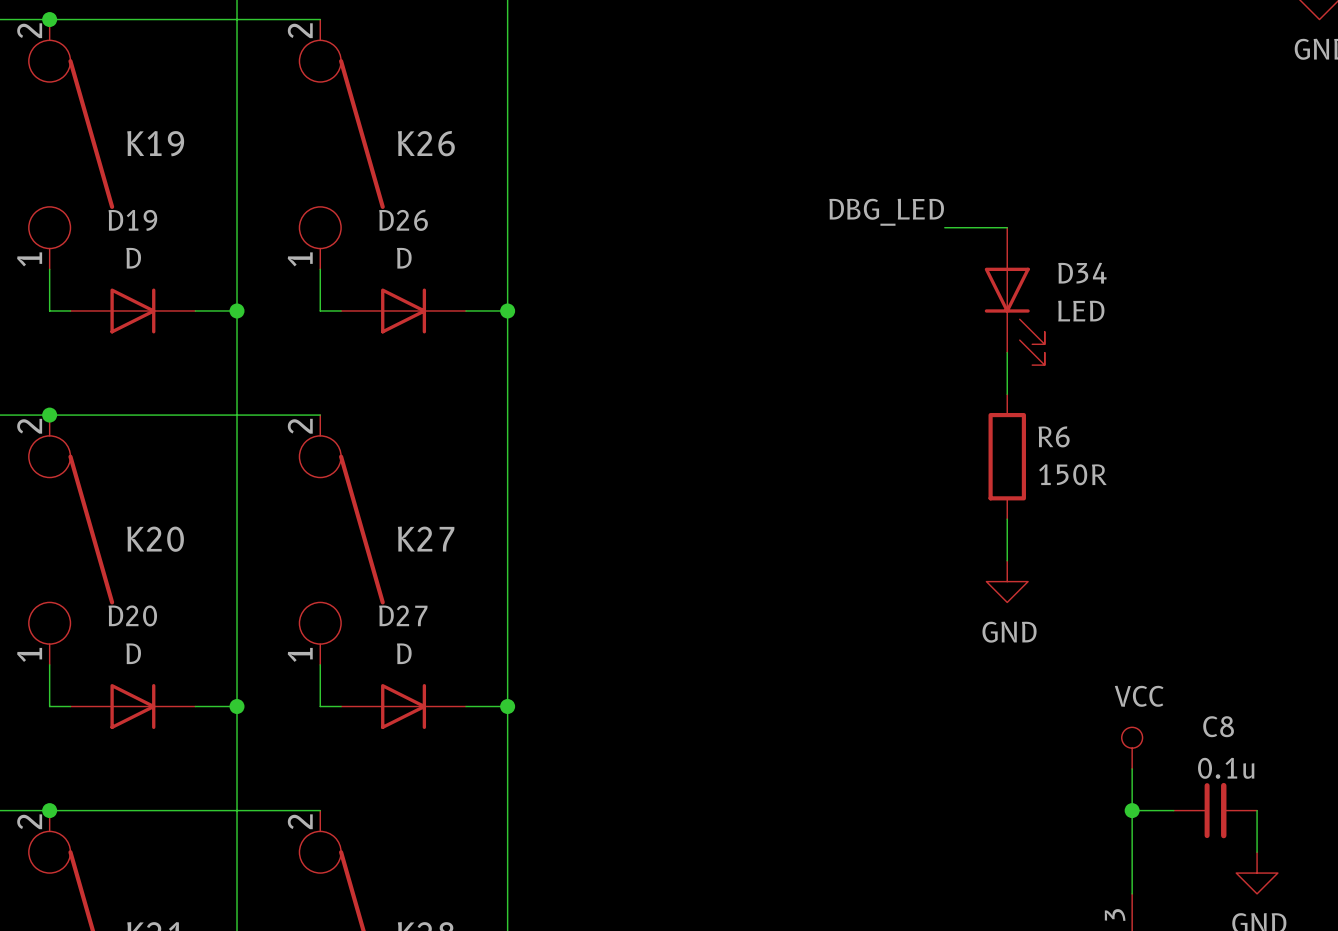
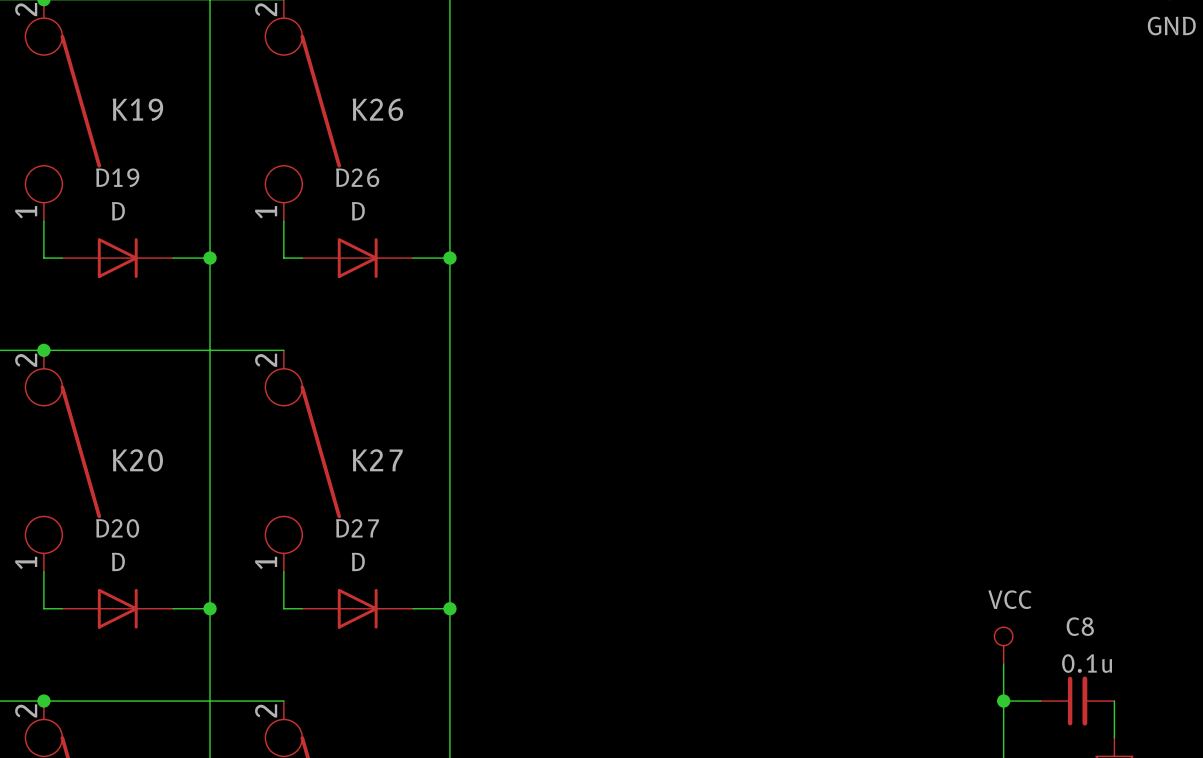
label: DBG_LED (886, 212) -> none
wire: (944, 227) (1007, 227) -> none
D34: LED (1014, 296) -> none
wire: (1007, 352) (1007, 394) -> none
R6: 150R (1007, 456) -> none
wire: (1007, 519) (1007, 560) -> none
power symbol: GND (1007, 581) -> none

